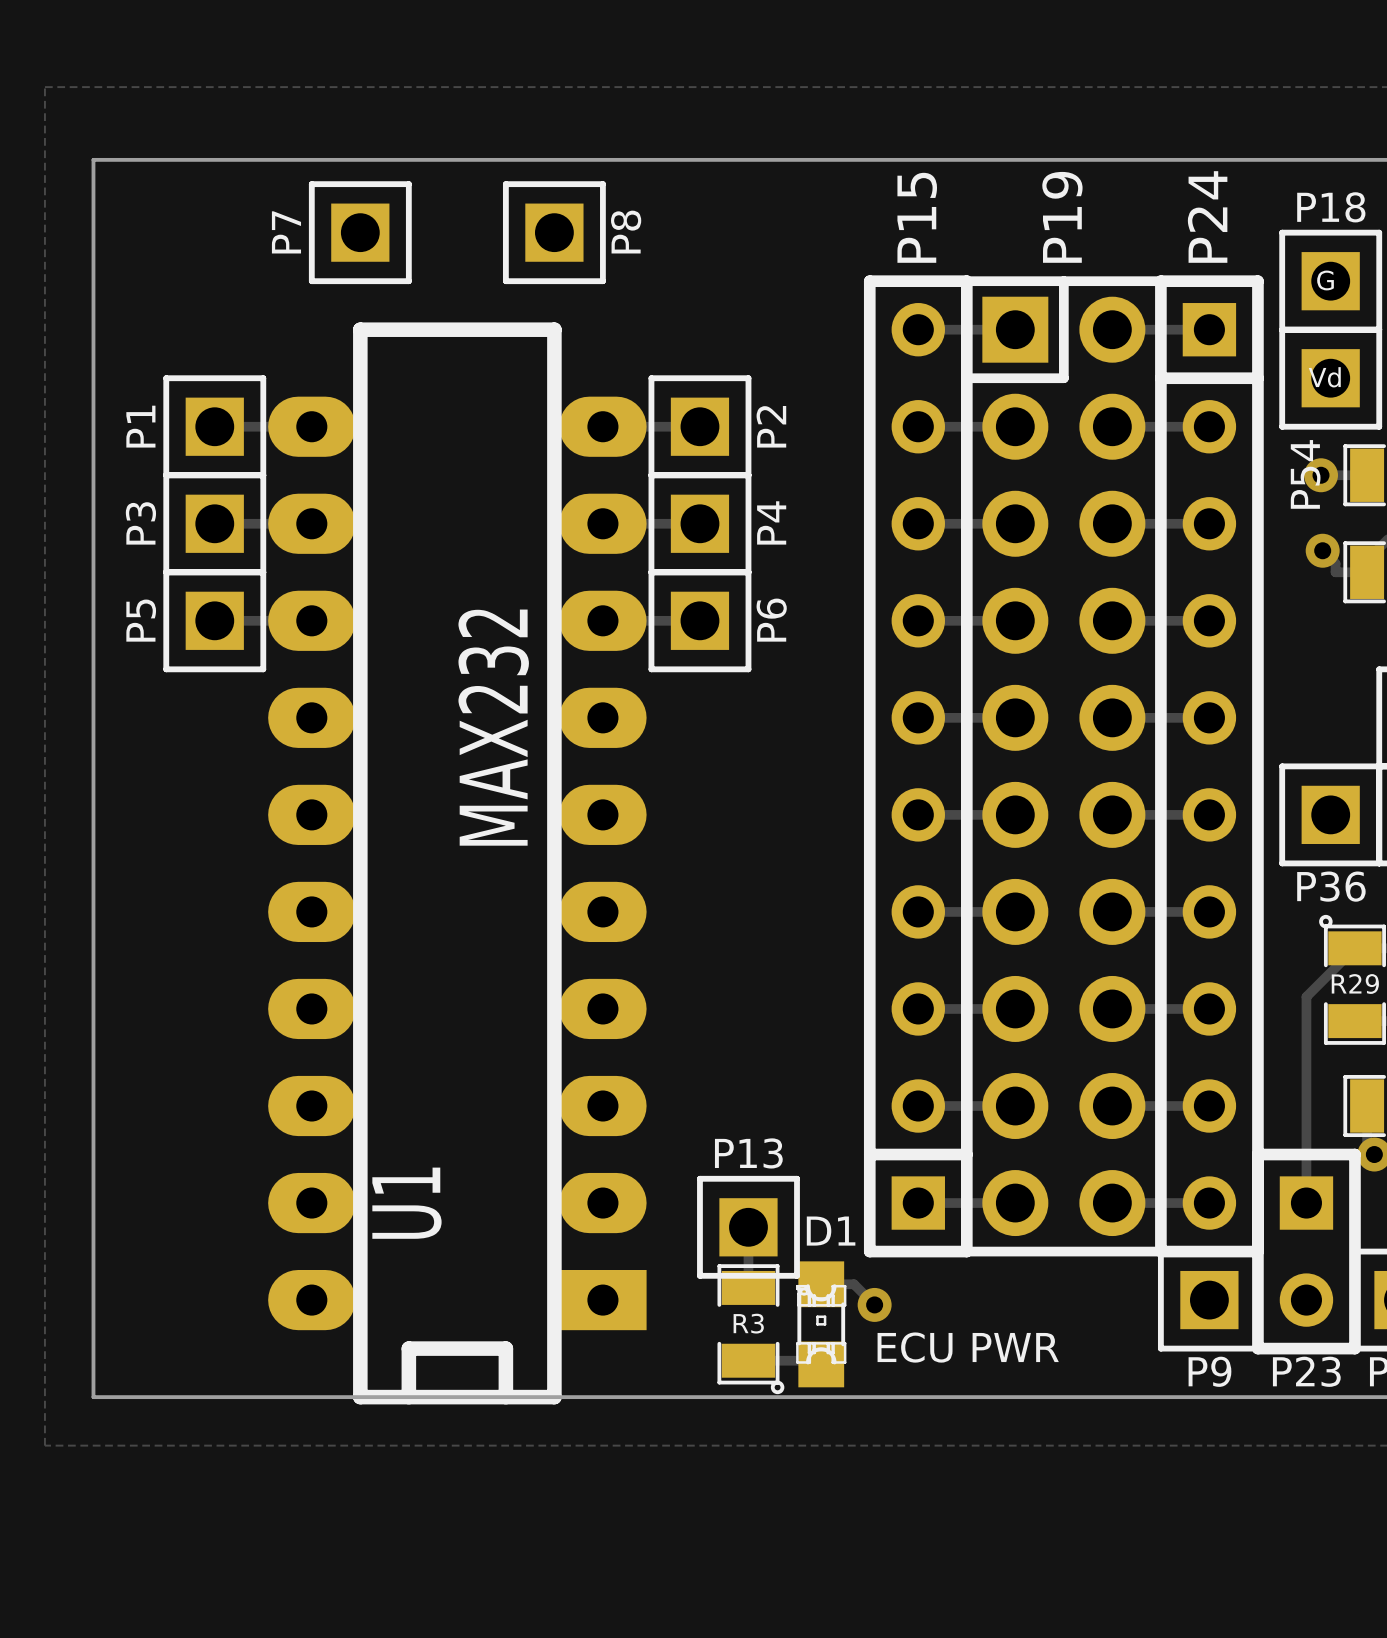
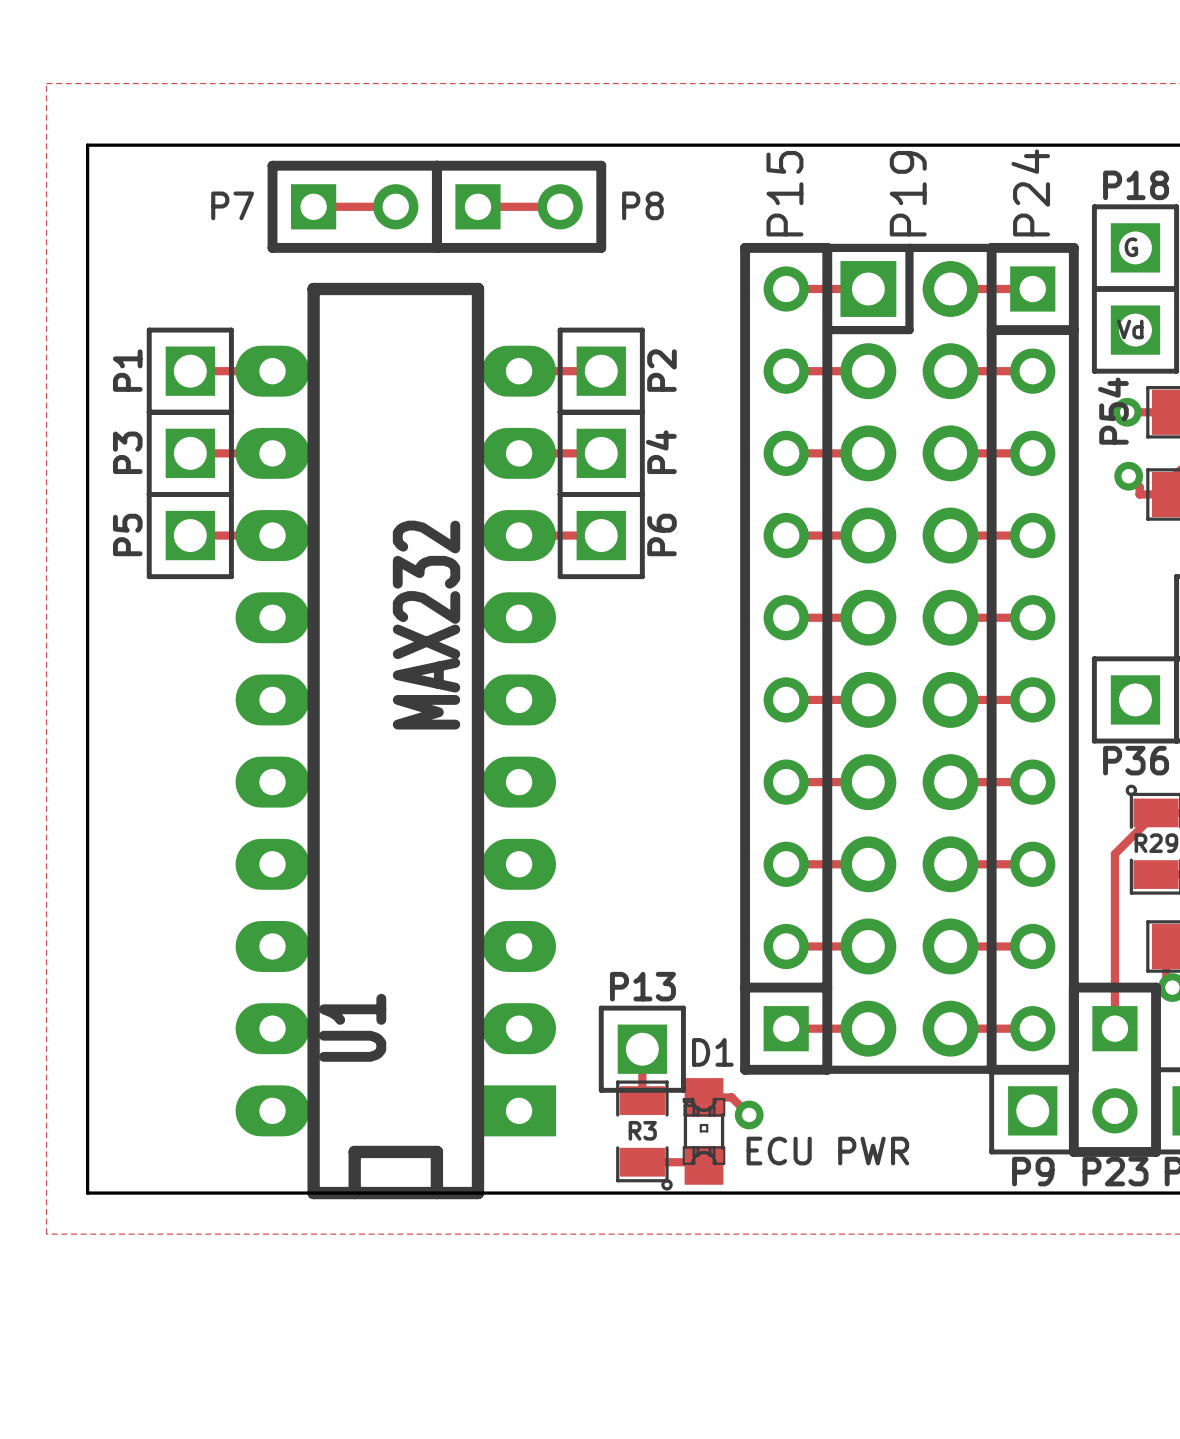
P7 footprint: [308, 181, 412, 285] -> [267, 160, 442, 253]
P8 footprint: [502, 181, 606, 285] -> [431, 160, 607, 253]
track: none -> (313, 206) (395, 206)
track: none -> (477, 206) (560, 206)

